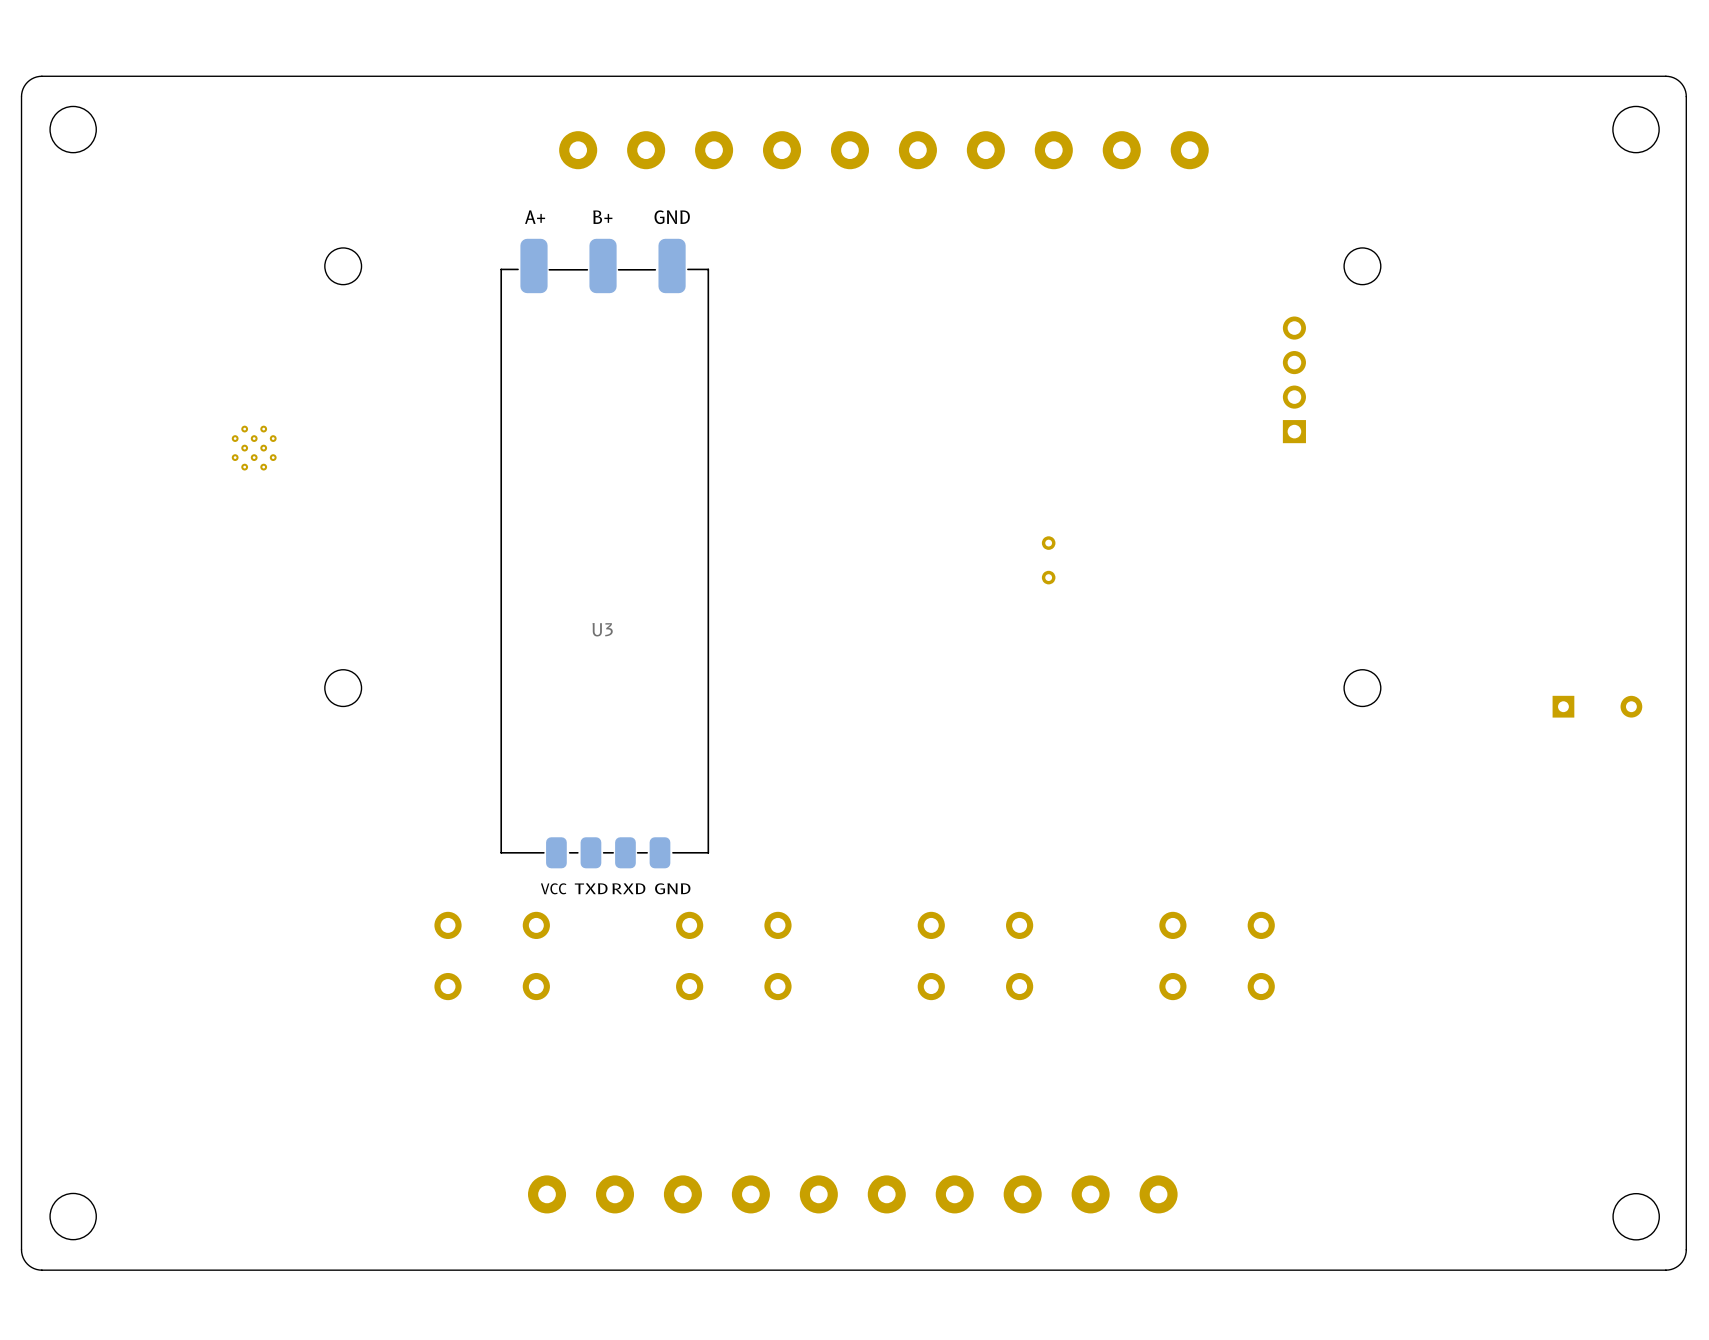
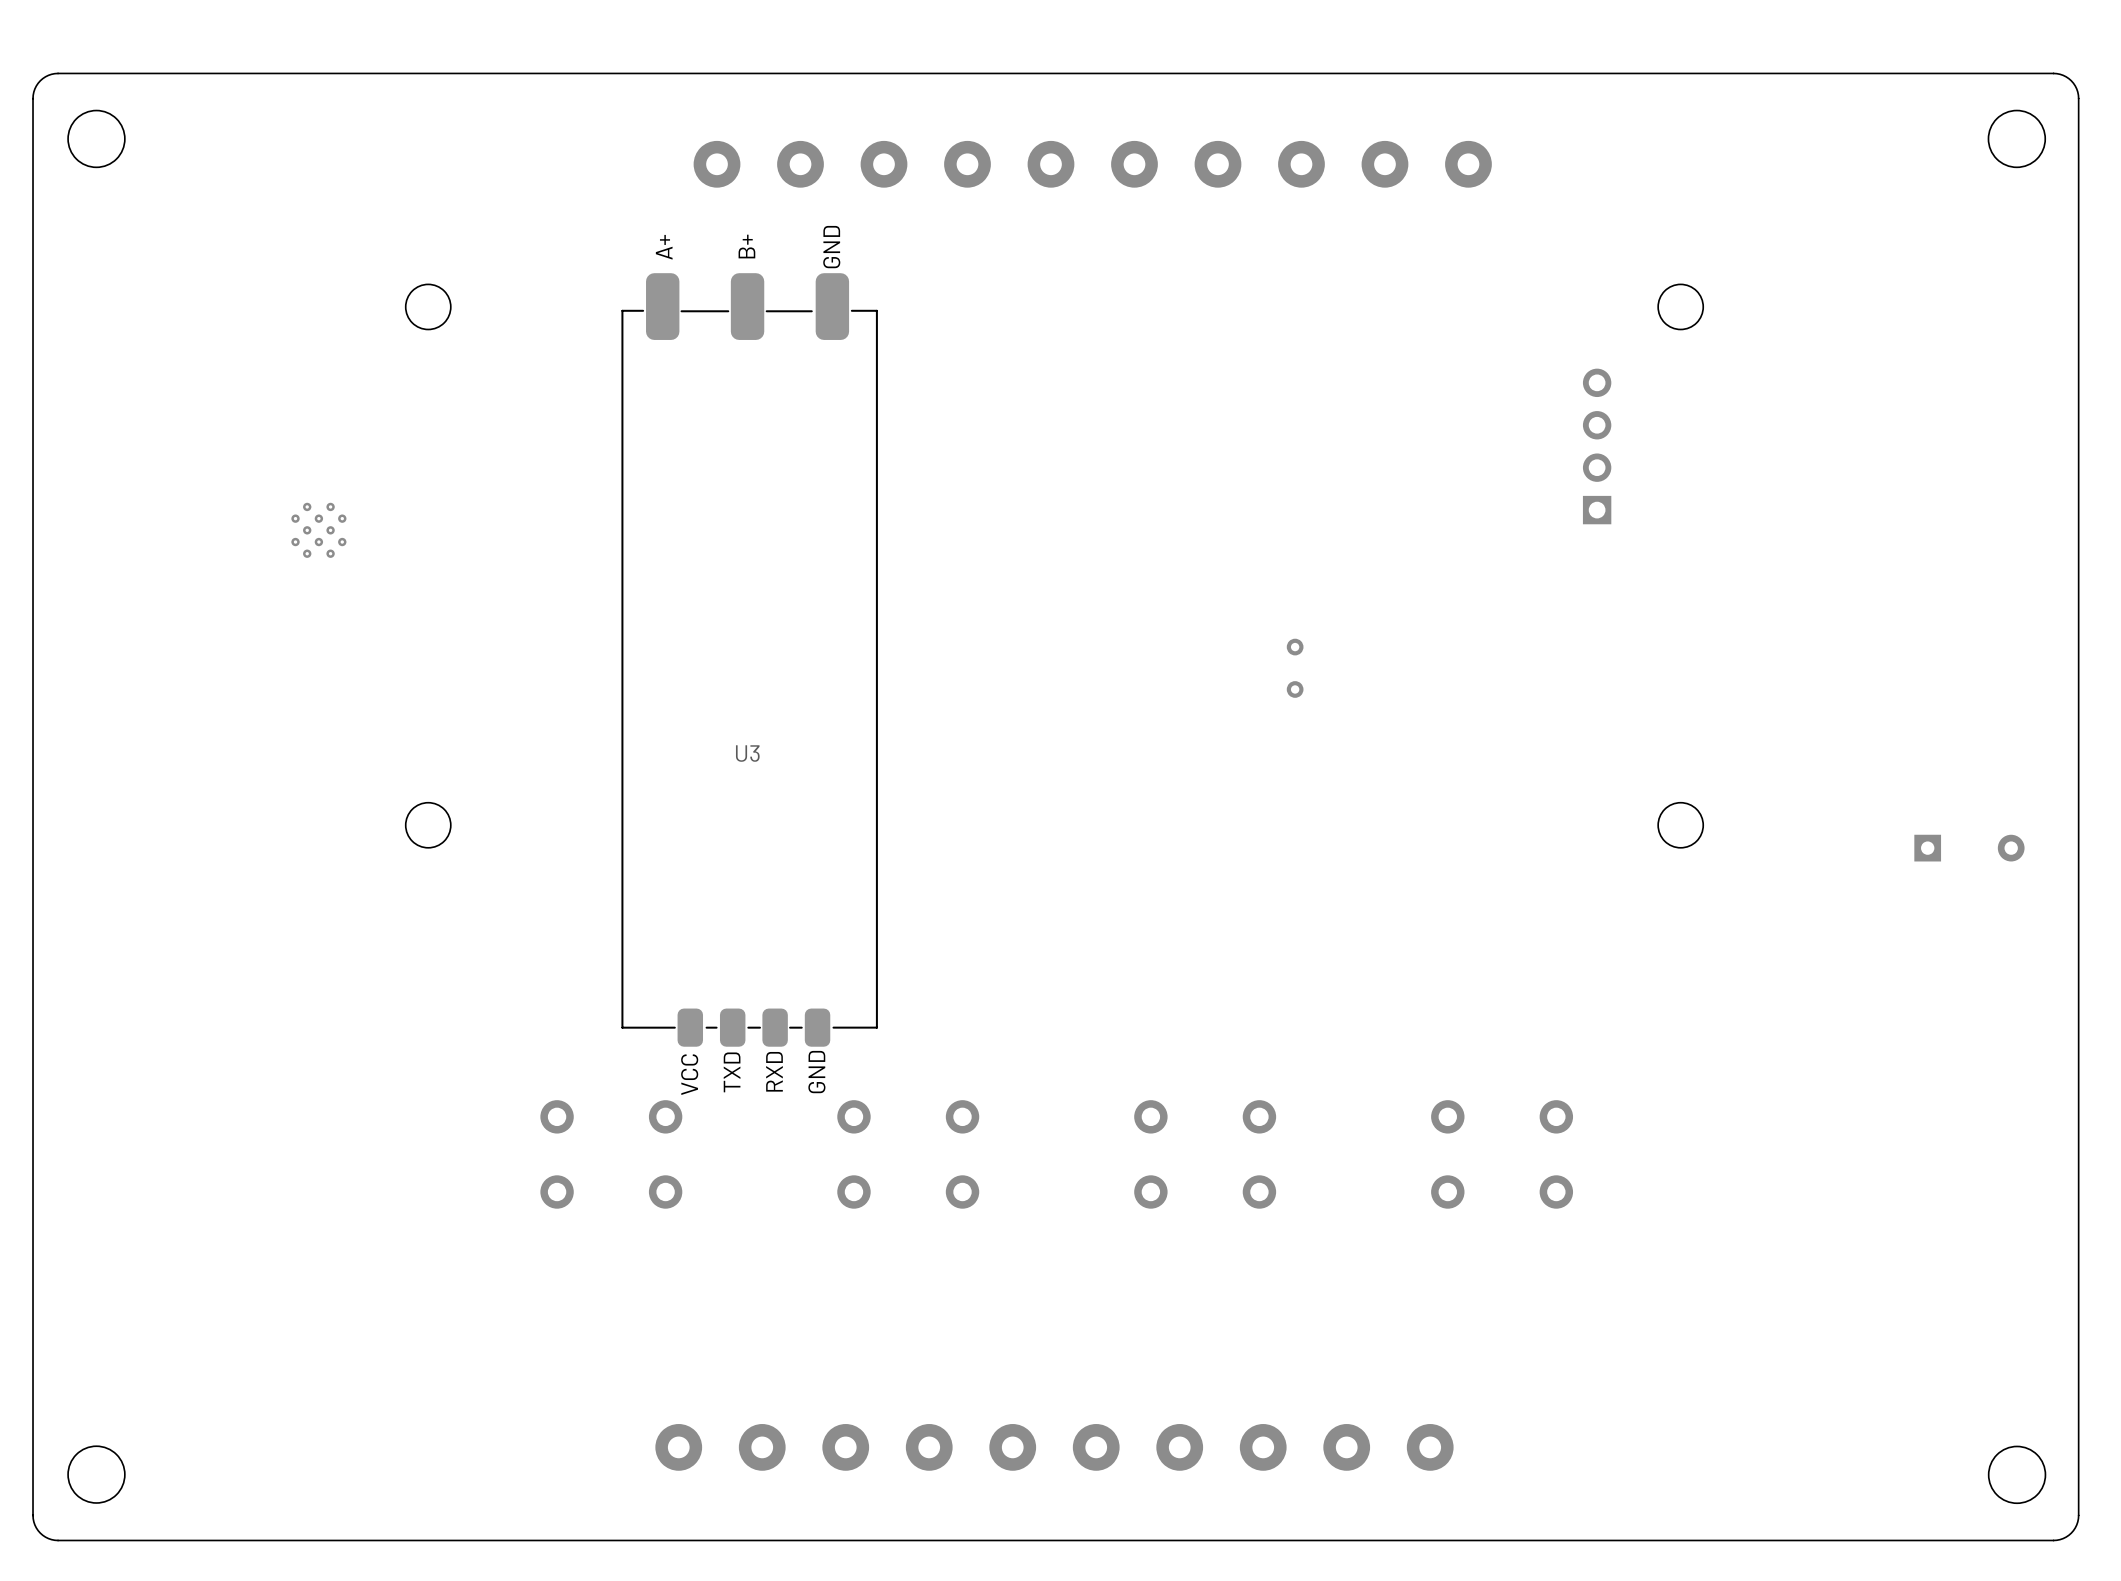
U3 footprint: [500, 238, 710, 869] -> [621, 273, 878, 1047]

